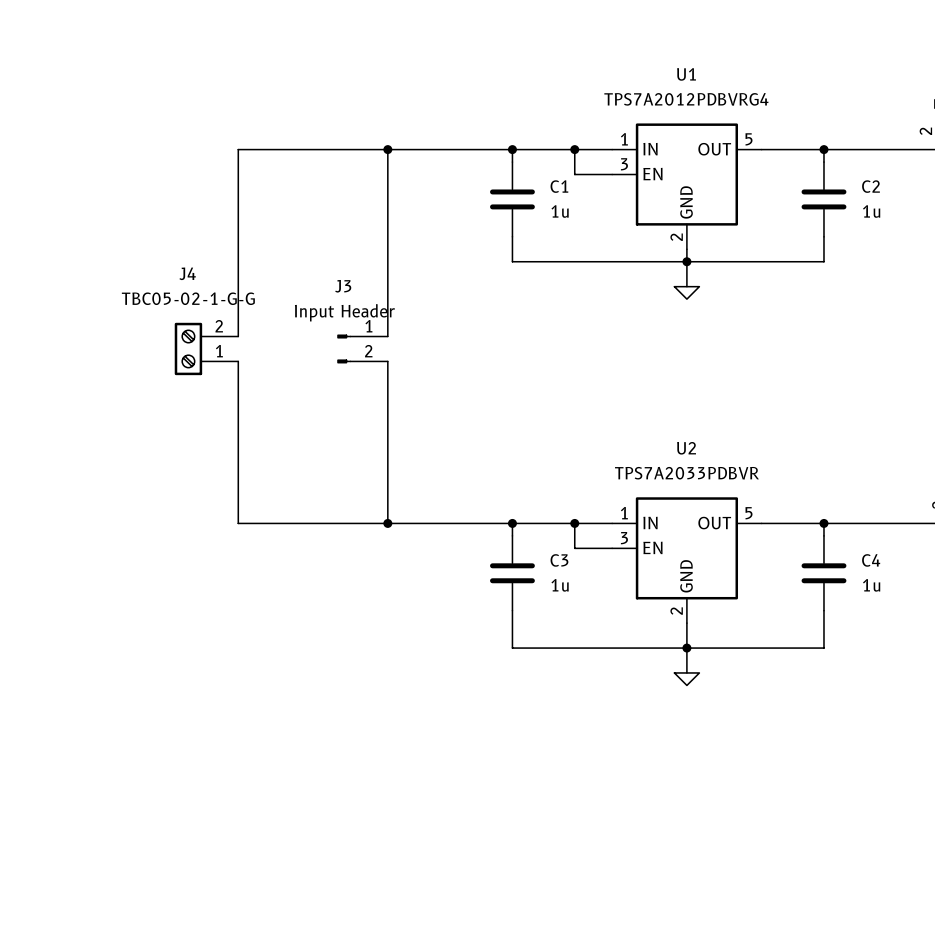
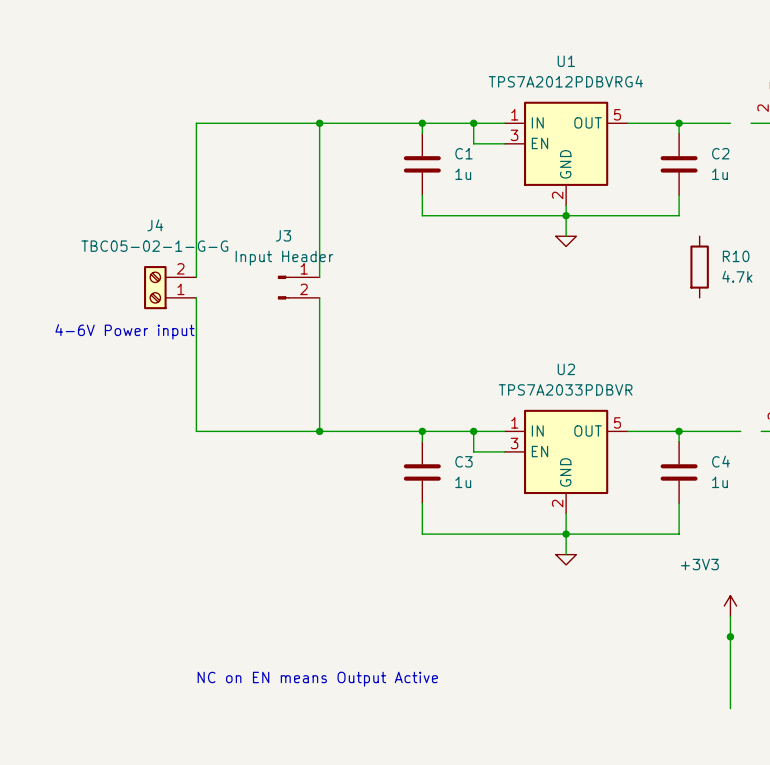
wire: (886, 149) (911, 149) -> none
R10: none -> 4.7k (699, 267)
text: none -> 4-6V Power input (124, 331)
wire: (898, 523) (923, 523) -> none
power symbol: none -> +3V3 (730, 605)
wire: none -> (730, 616) (730, 708)
junction: none -> (730, 636)
text: none -> NC on EN means Output Active (317, 679)

